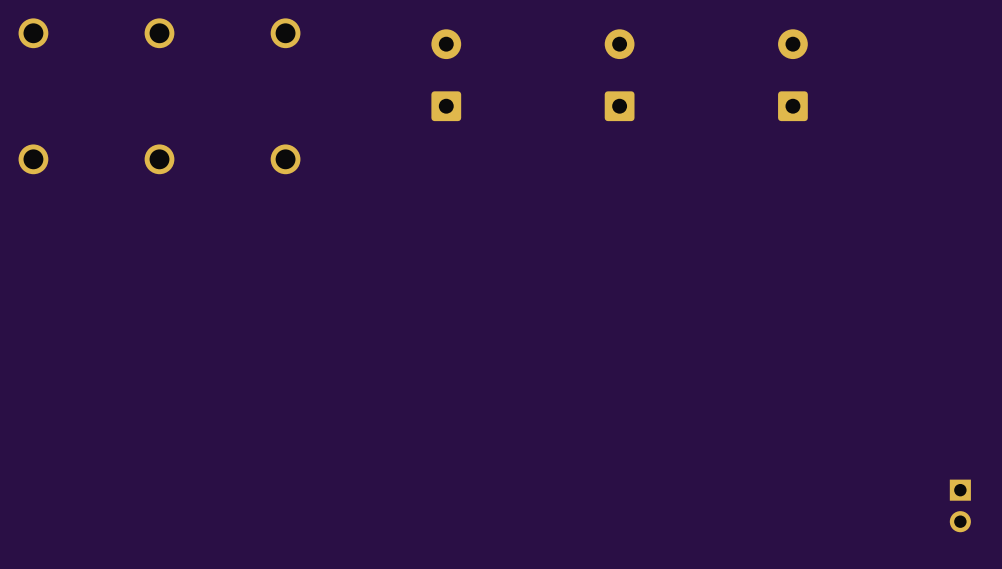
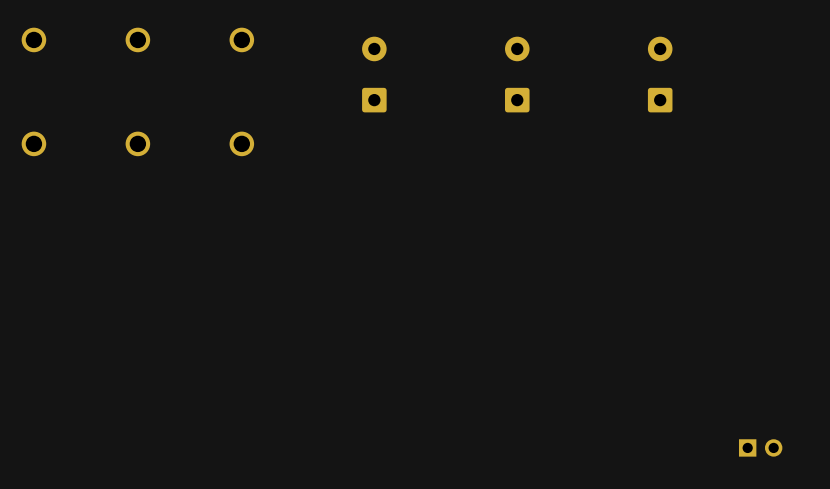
part rotation: 0° (960, 505) -> 90° counterclockwise (760, 447)
part position: (960, 505) -> (760, 447)

